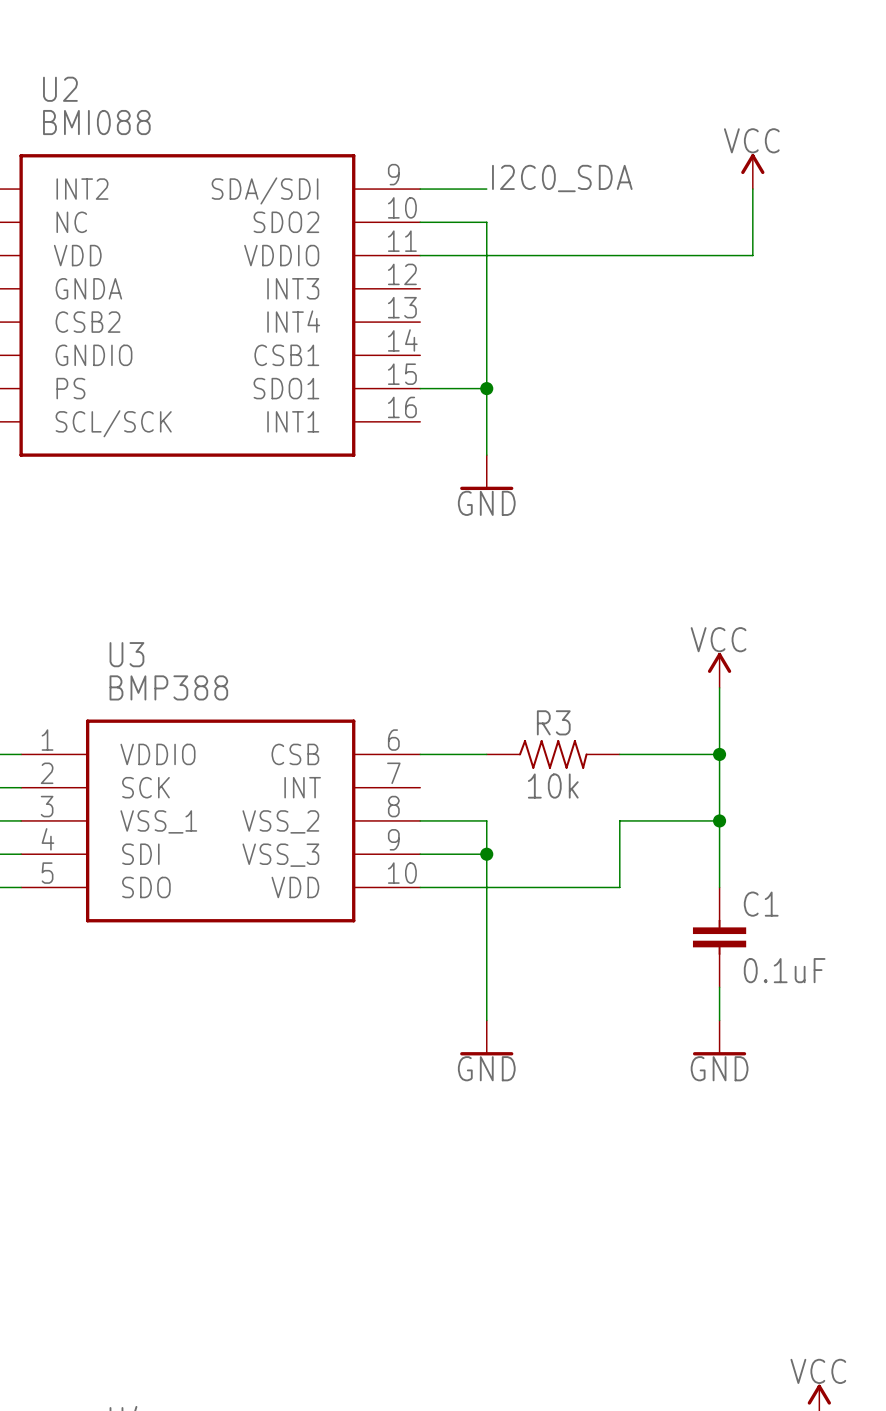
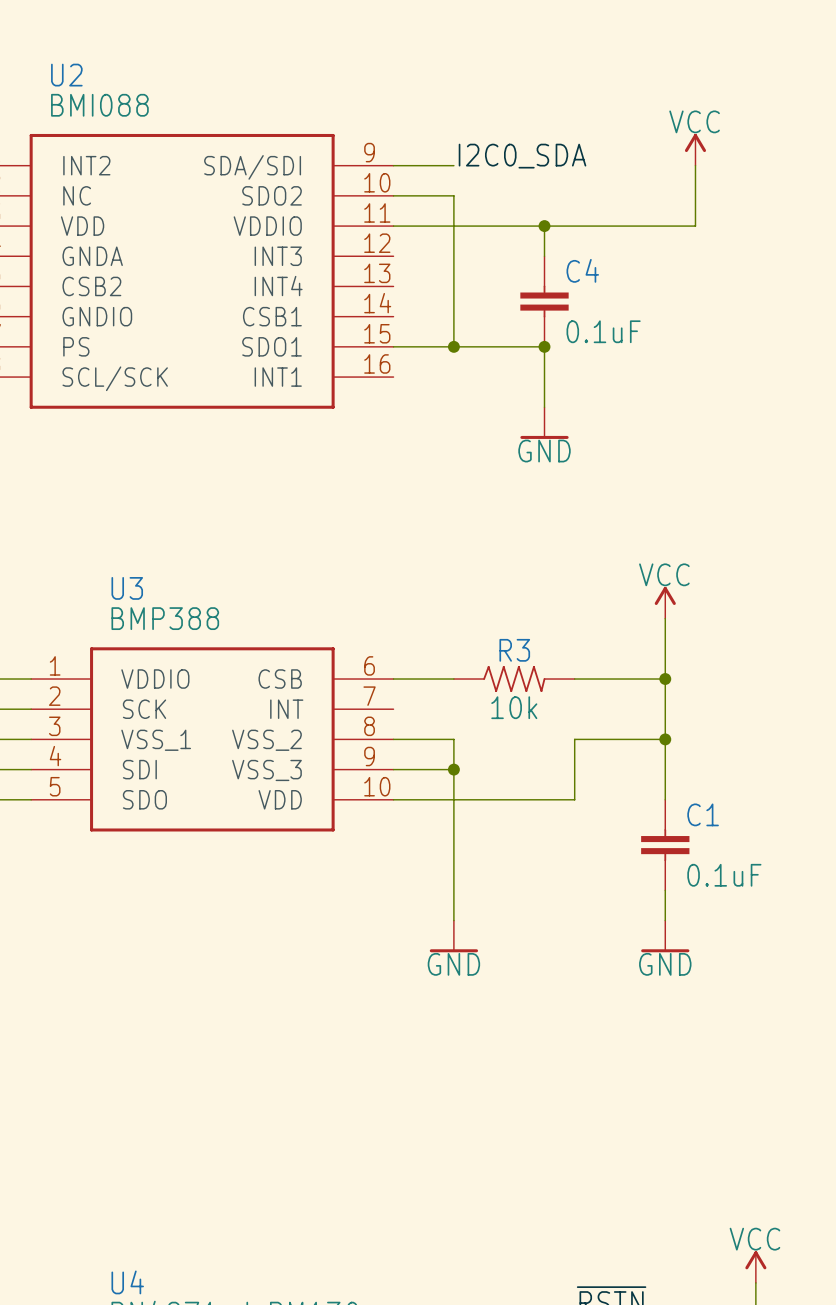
wire: none -> (544, 226) (544, 256)
junction: none -> (544, 226)
C4: none -> 0.1uF (544, 301)
wire: (486, 388) (486, 455) -> (453, 346) (544, 346) (544, 407)
junction: none -> (544, 346)
power symbol position: GND (486, 472) -> GND (544, 423)

